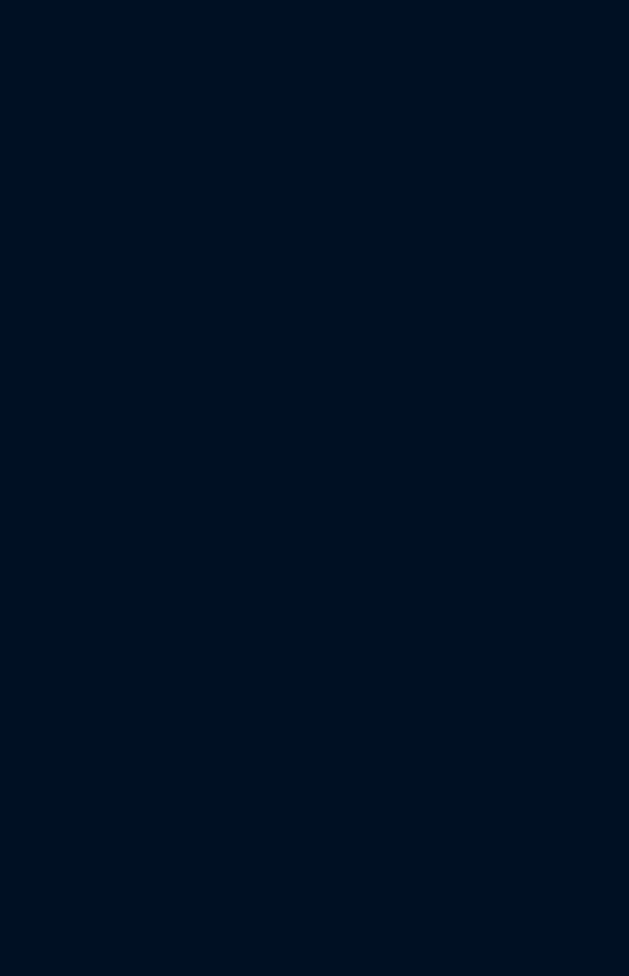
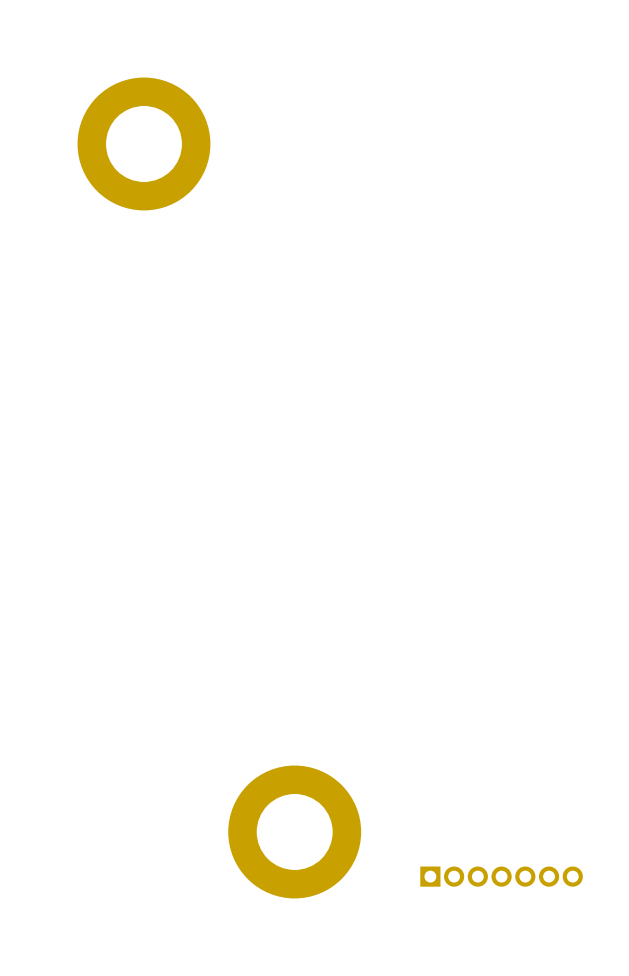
part: none -> (143, 143)
part: none -> (294, 831)
part: none -> (501, 876)

